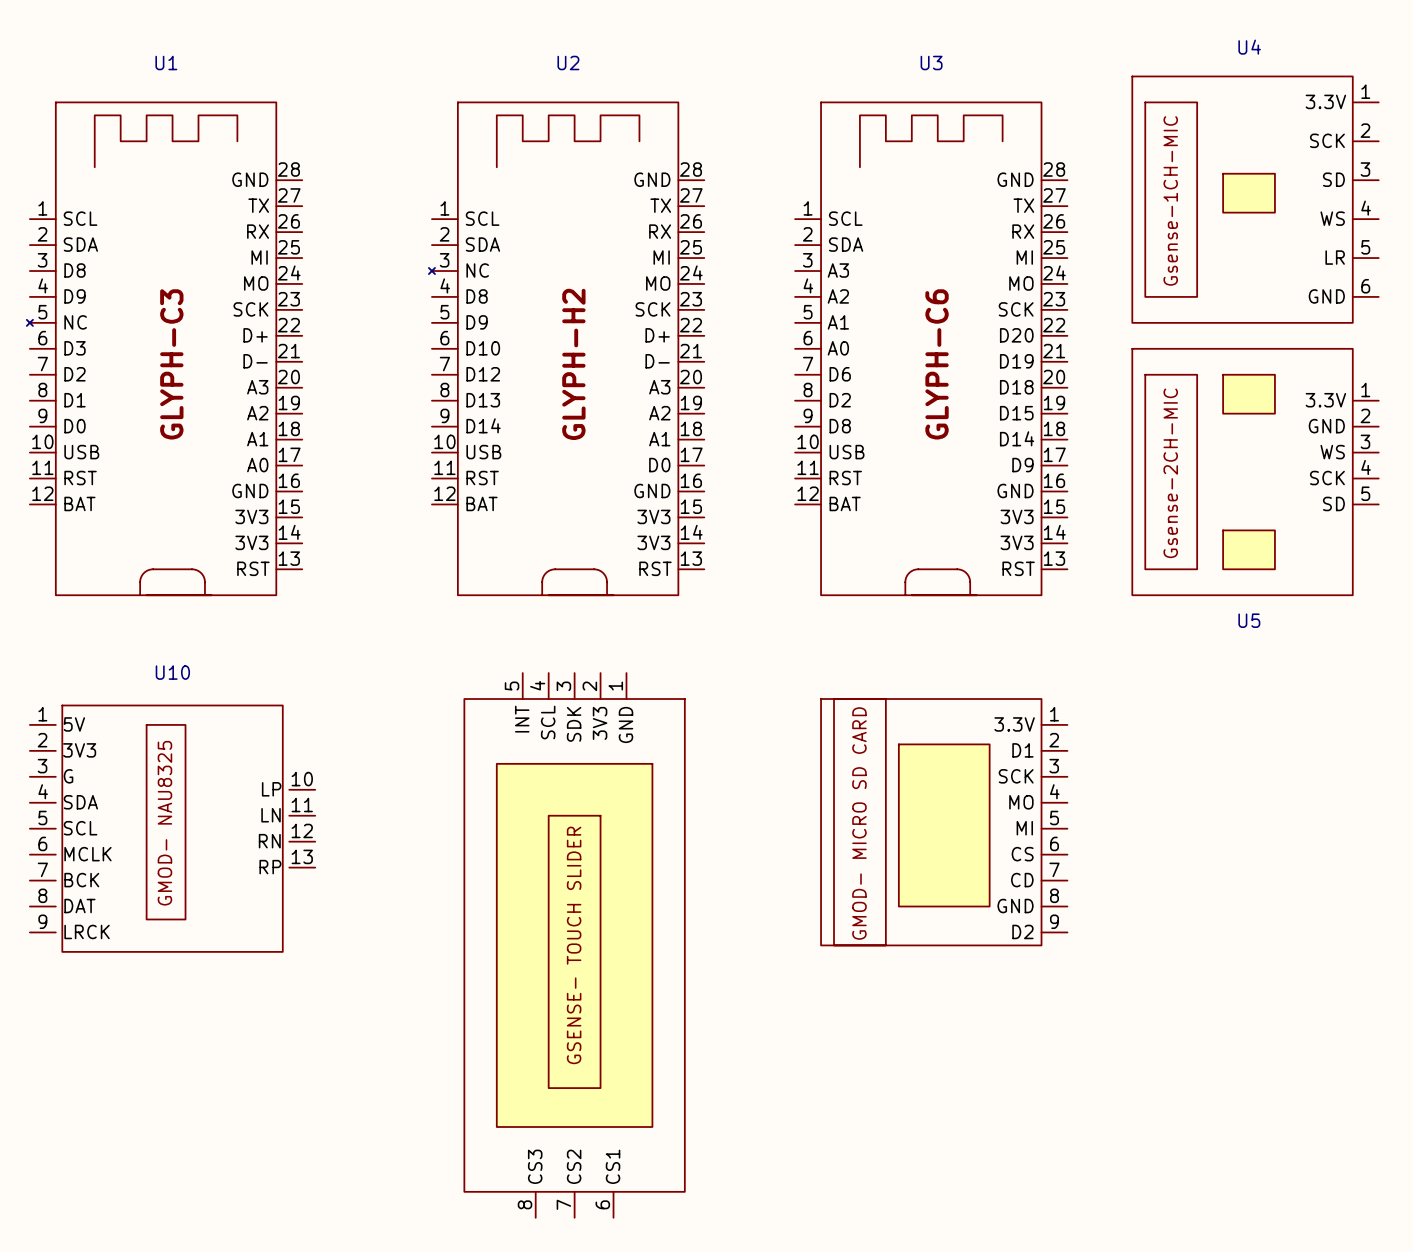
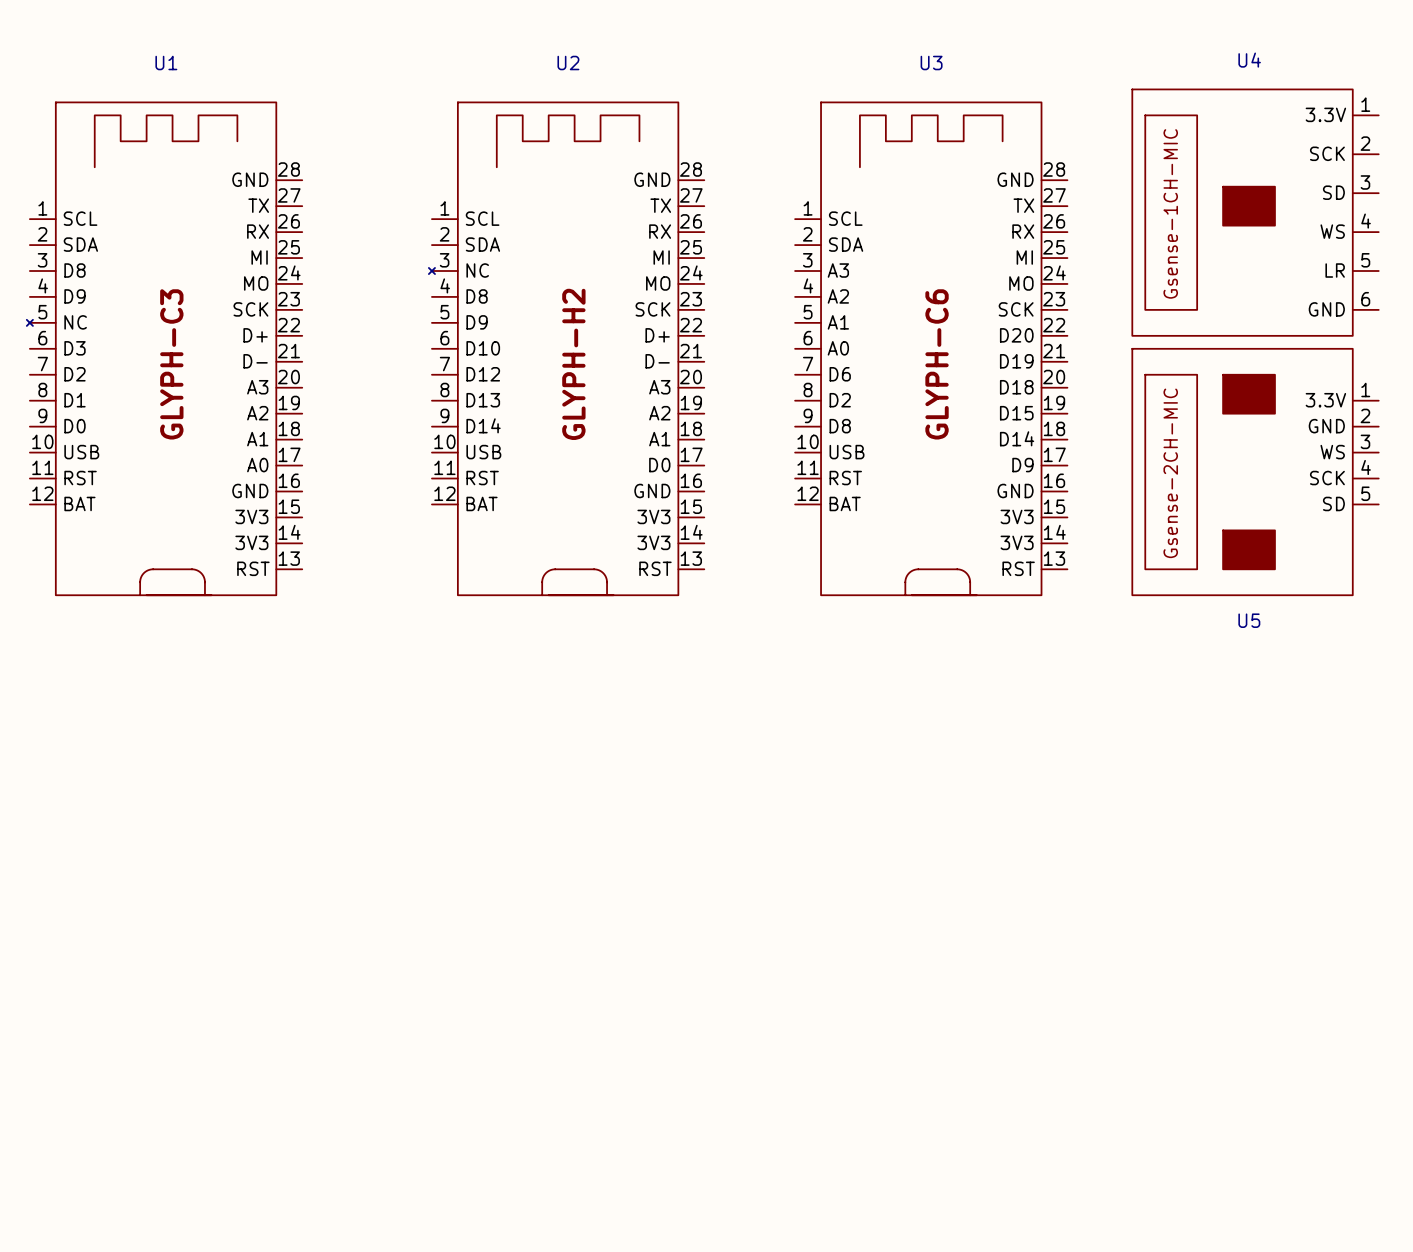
U4 symbol: [1132, 76, 1379, 323] -> [1132, 89, 1379, 336]
U5 symbol: [1132, 348, 1379, 596] -> [1132, 348, 1379, 596]
part: (944, 822) -> none
U10: (172, 828) -> none
part: (574, 945) -> none

